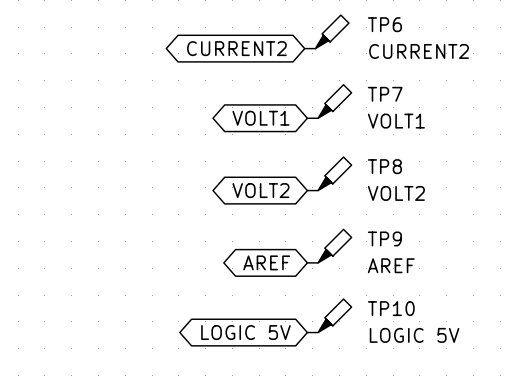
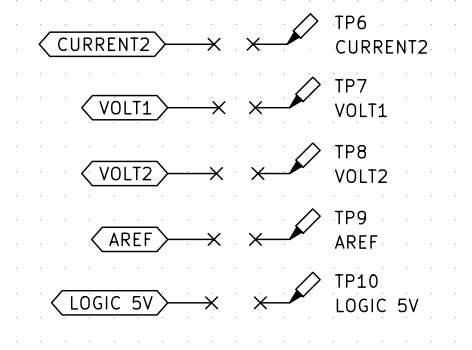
wire: none -> (165, 44) (214, 44)
no-connect mark: none -> (214, 44)
global label position: CURRENT2 (236, 48) -> CURRENT2 (103, 44)
wire: none -> (253, 44) (277, 44)
no-connect mark: none -> (253, 44)
wire: none -> (167, 107) (218, 107)
no-connect mark: none -> (218, 107)
global label position: VOLT1 (260, 118) -> VOLT1 (125, 107)
wire: none -> (255, 107) (279, 107)
no-connect mark: none -> (255, 107)
wire: none -> (167, 173) (216, 173)
no-connect mark: none -> (216, 173)
global label position: VOLT2 (260, 190) -> VOLT2 (125, 173)
wire: none -> (257, 173) (279, 173)
no-connect mark: none -> (257, 173)
wire: none -> (167, 239) (214, 239)
no-connect mark: none -> (214, 239)
global label position: AREF (266, 262) -> AREF (130, 239)
wire: none -> (255, 239) (279, 239)
no-connect mark: none -> (255, 239)
wire: none -> (167, 302) (211, 302)
no-connect mark: none -> (211, 302)
global label position: LOGIC 5V (245, 332) -> LOGIC 5V (111, 302)
wire: none -> (260, 302) (279, 302)
no-connect mark: none -> (260, 302)

